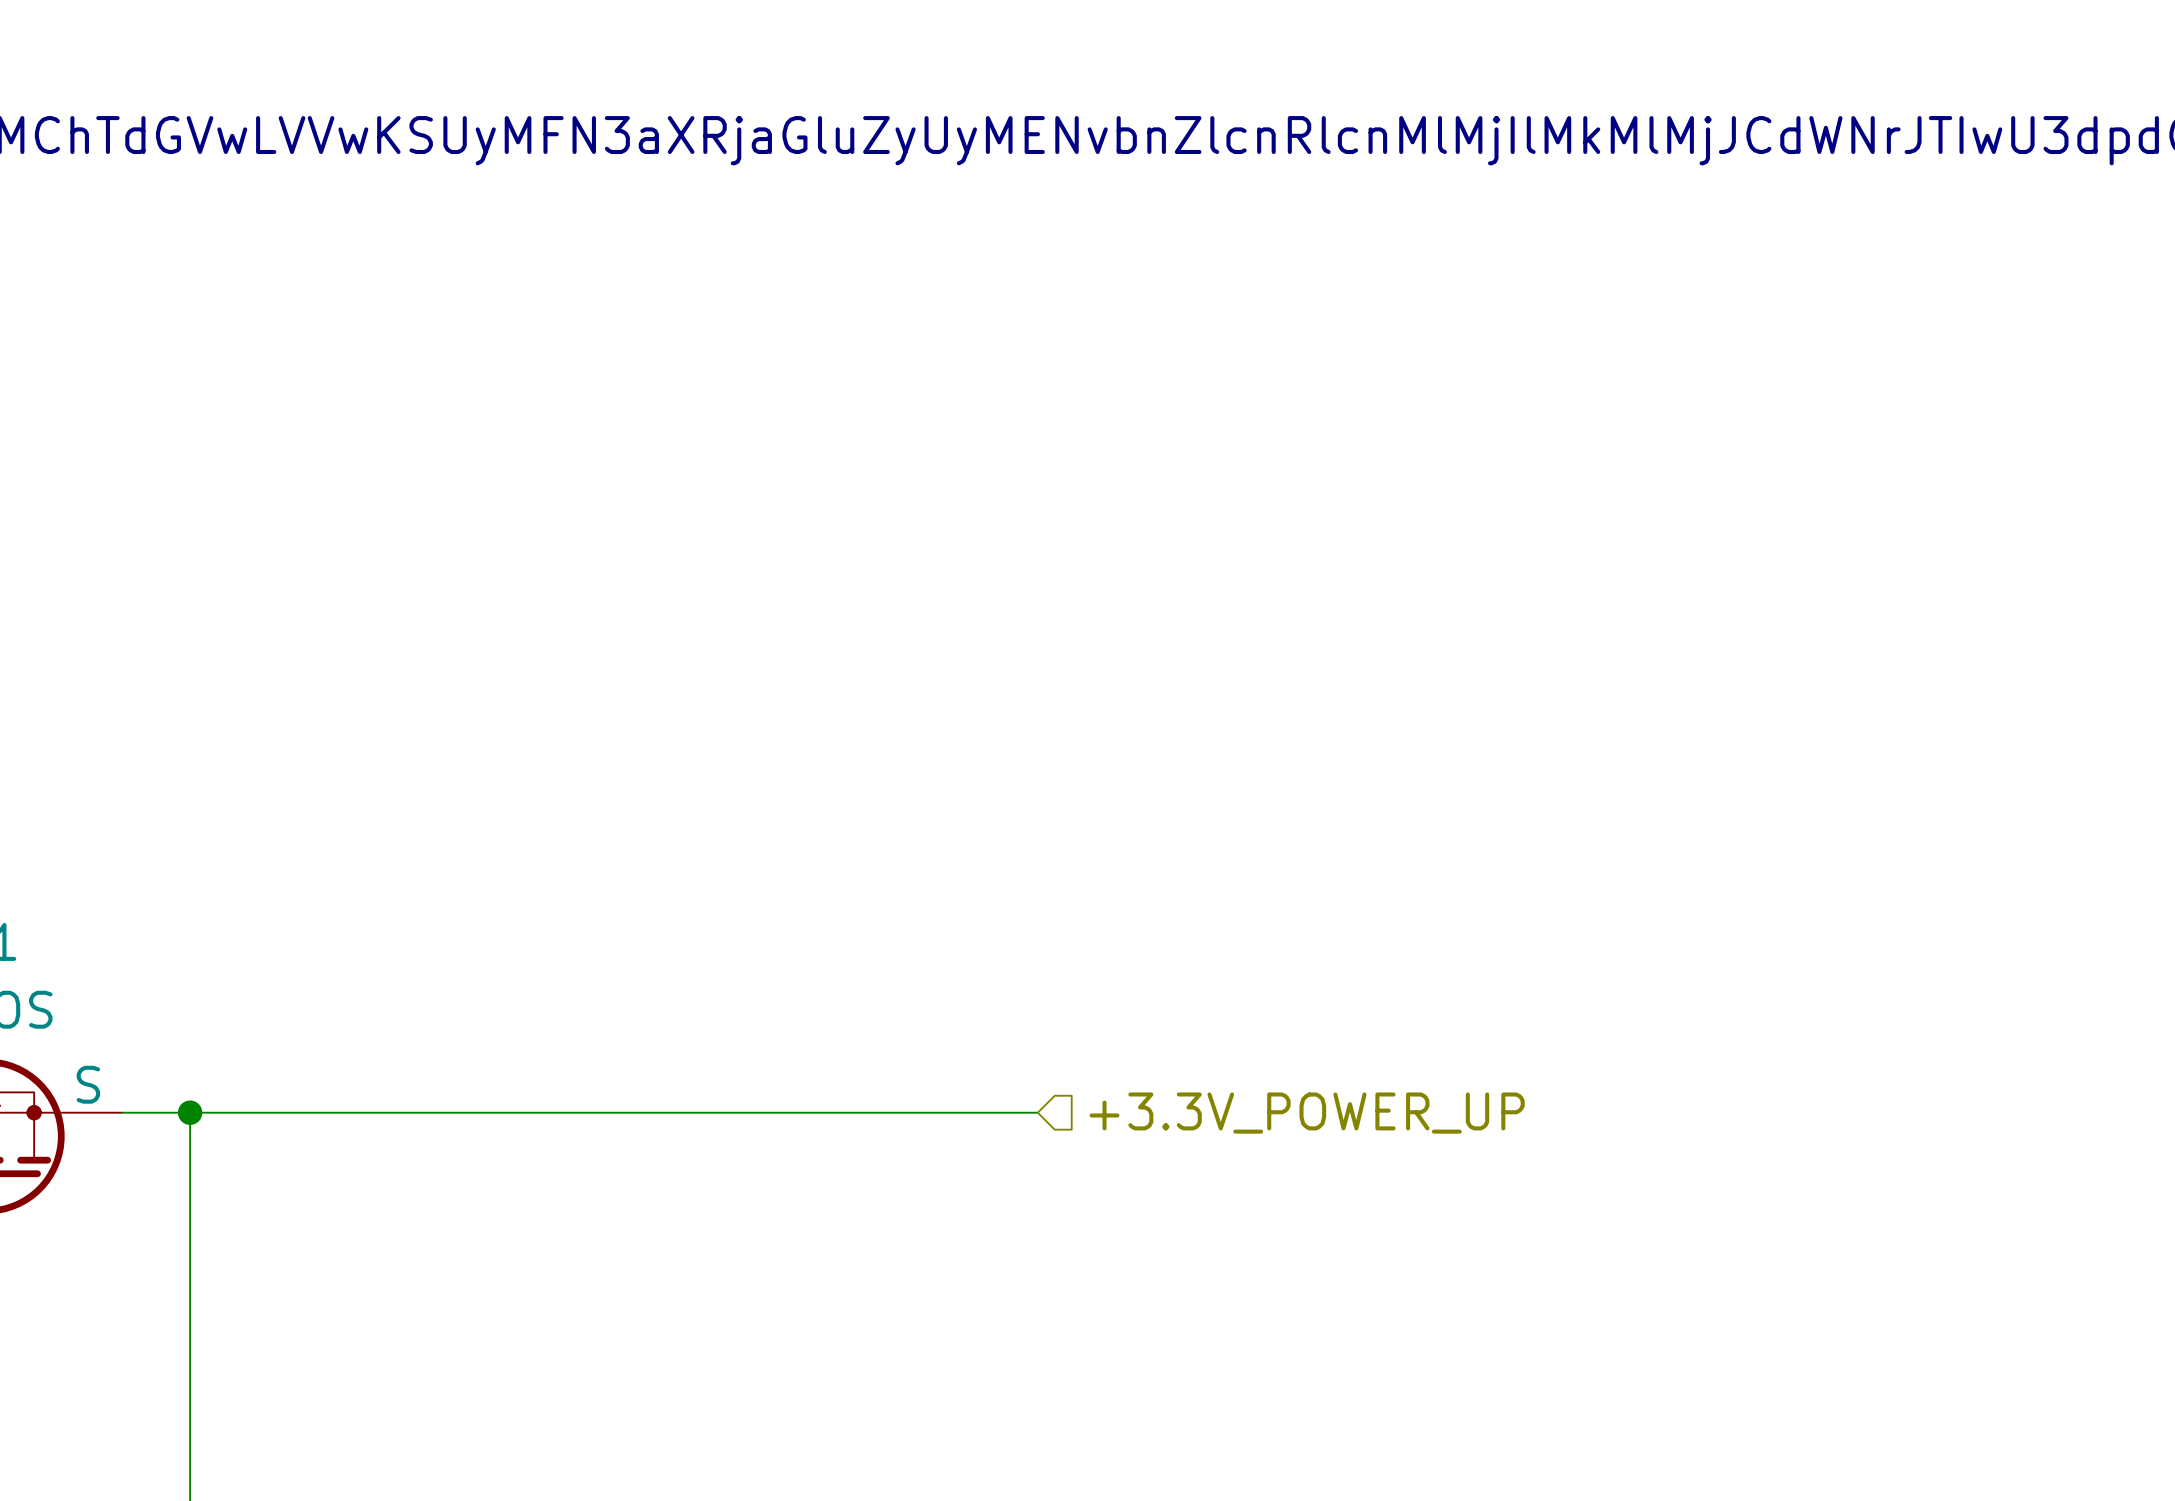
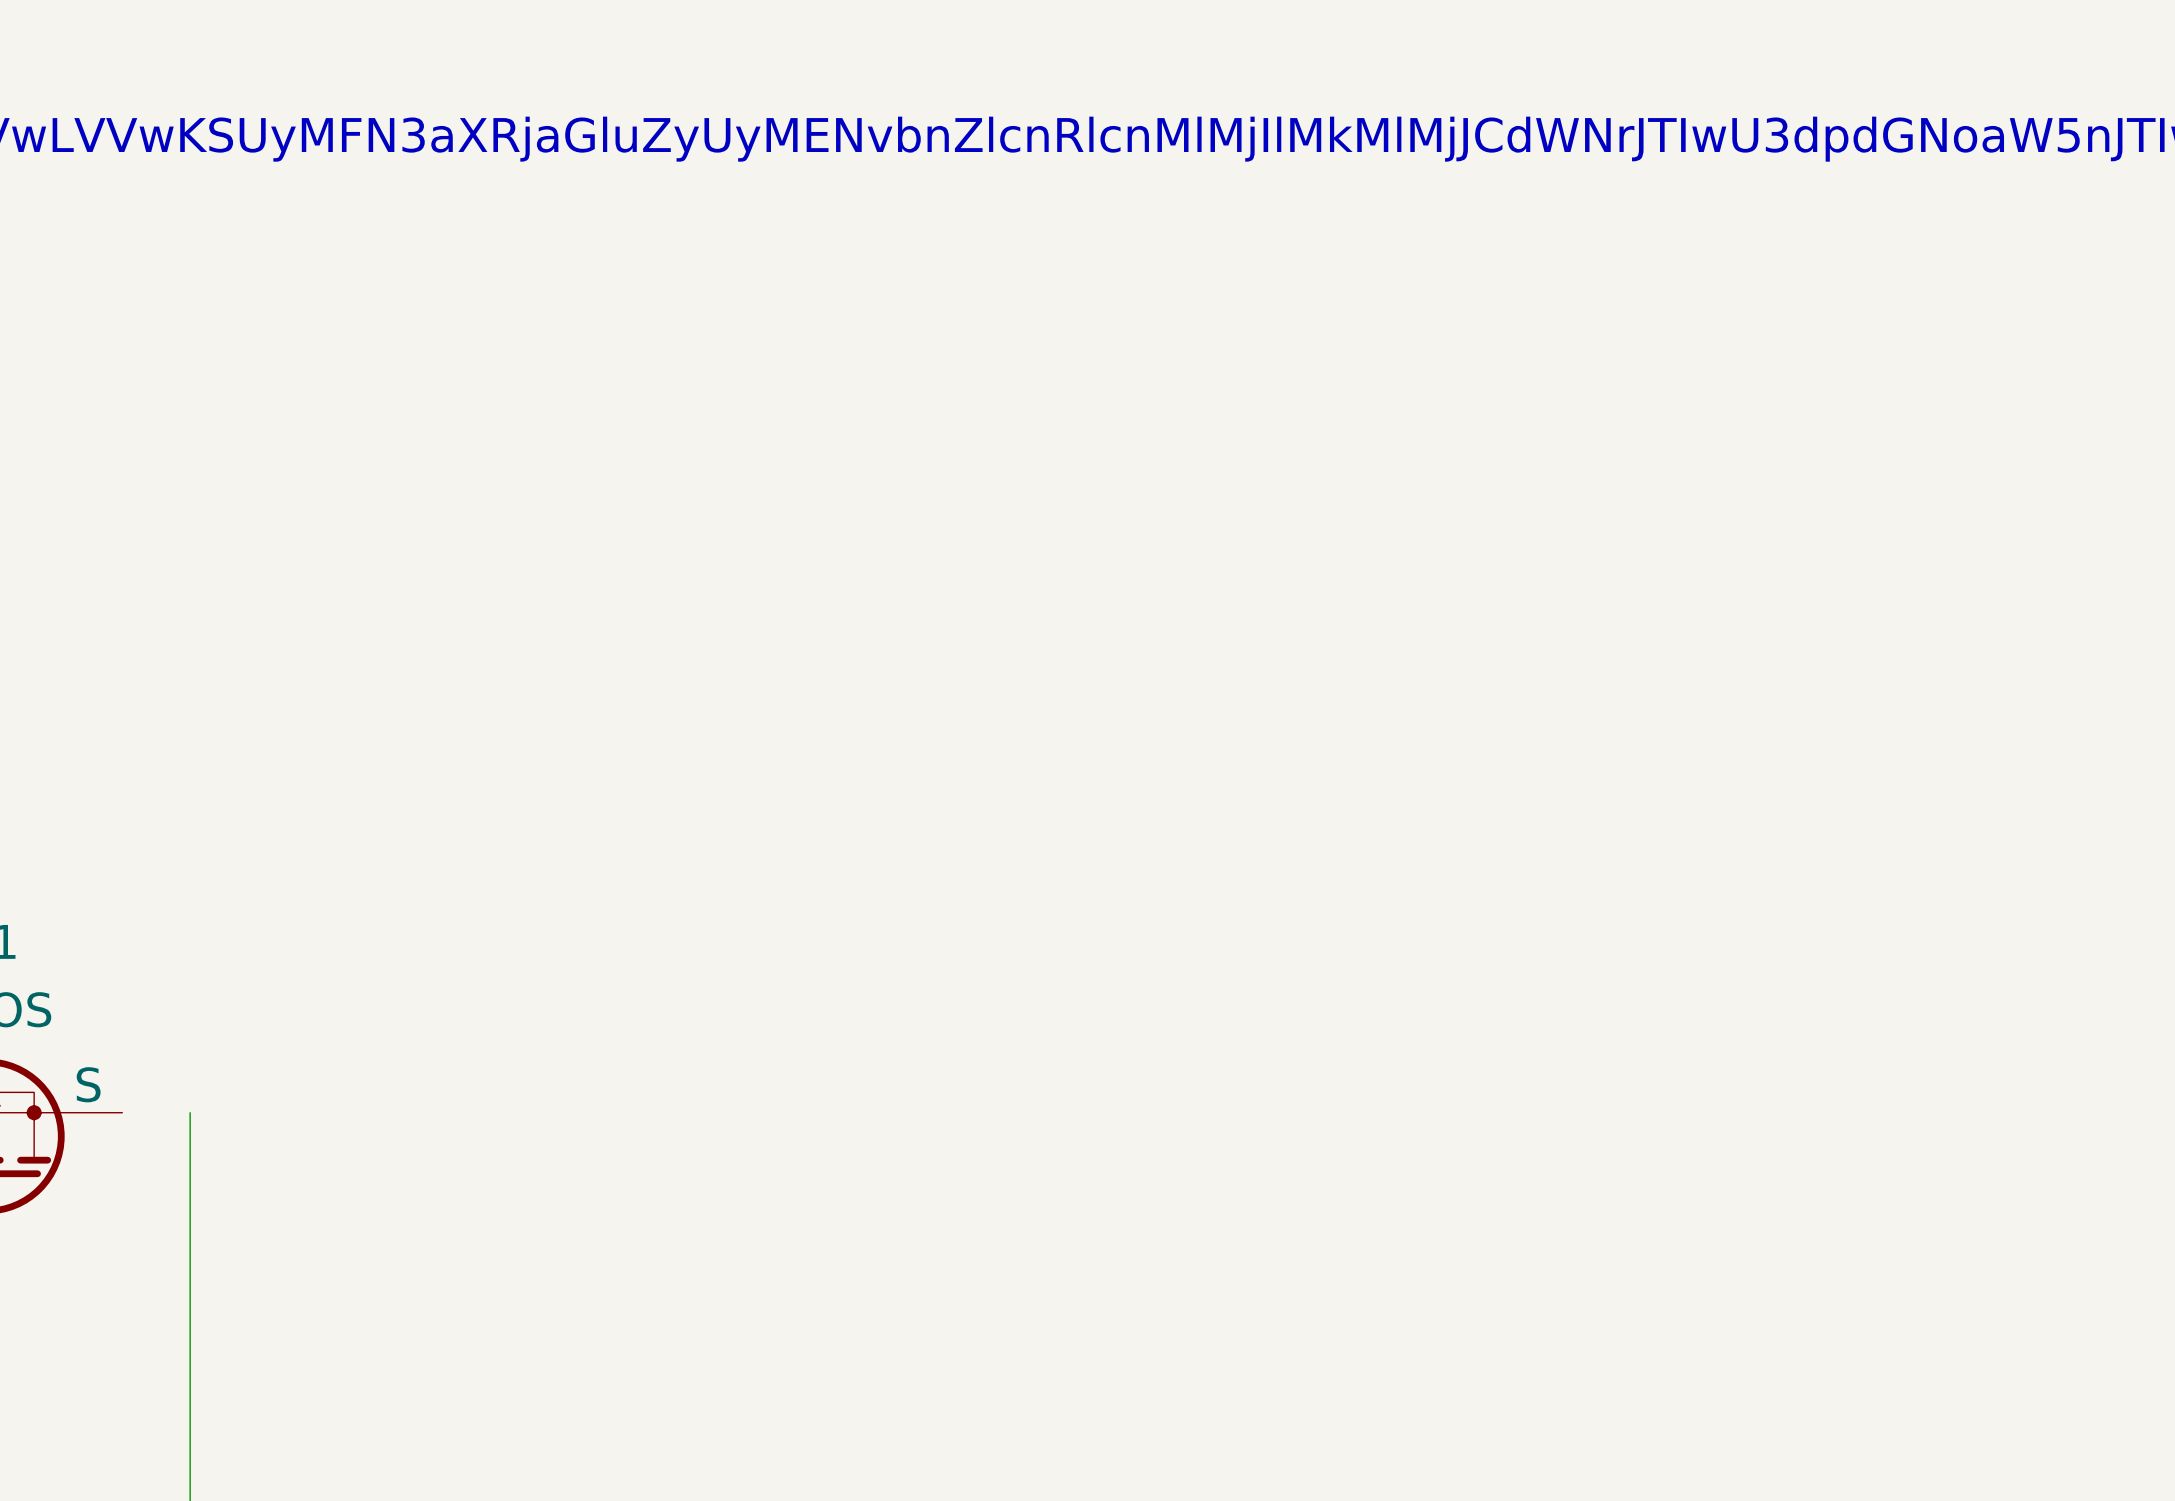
wire: (122, 1112) (1037, 1112) -> none
junction: (190, 1112) -> none
hierarchical label: +3.3V_POWER_UP (1307, 1113) -> none

